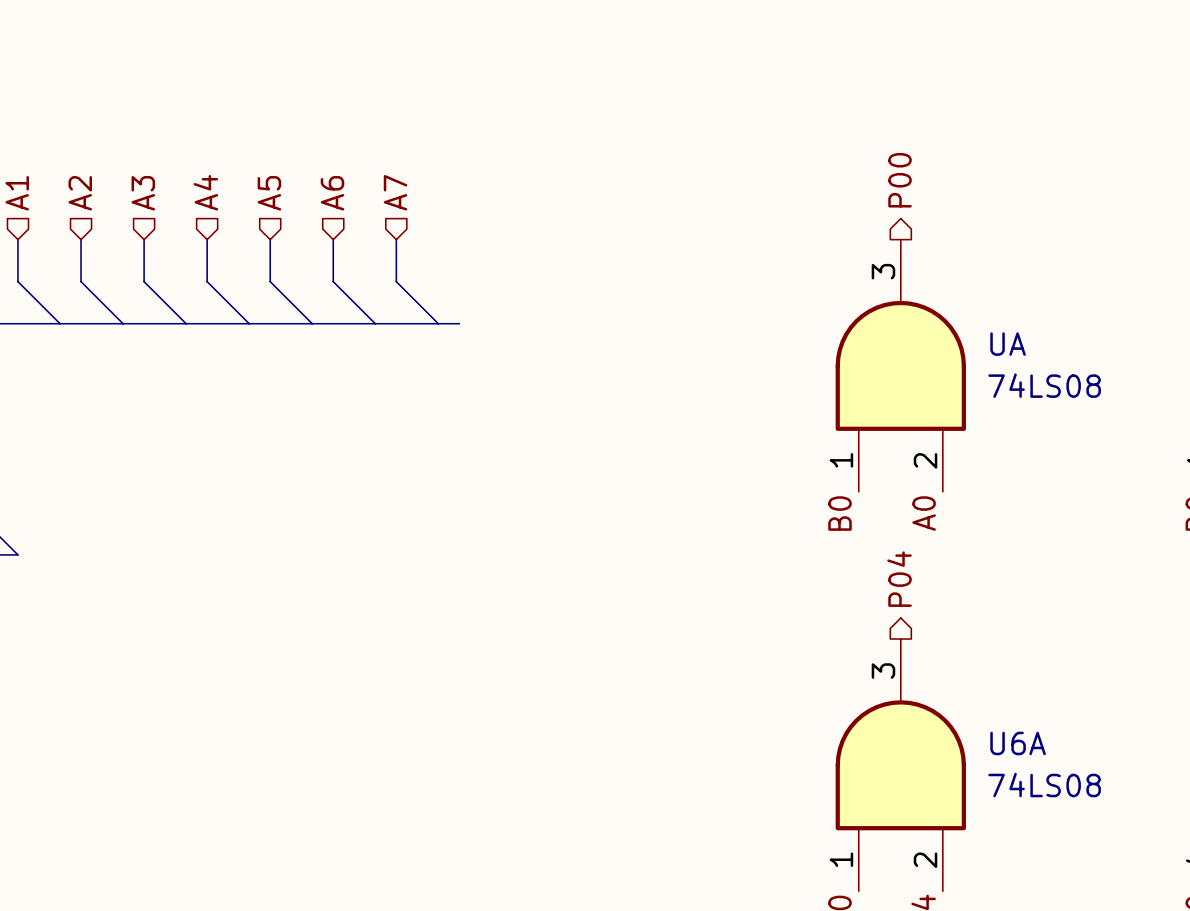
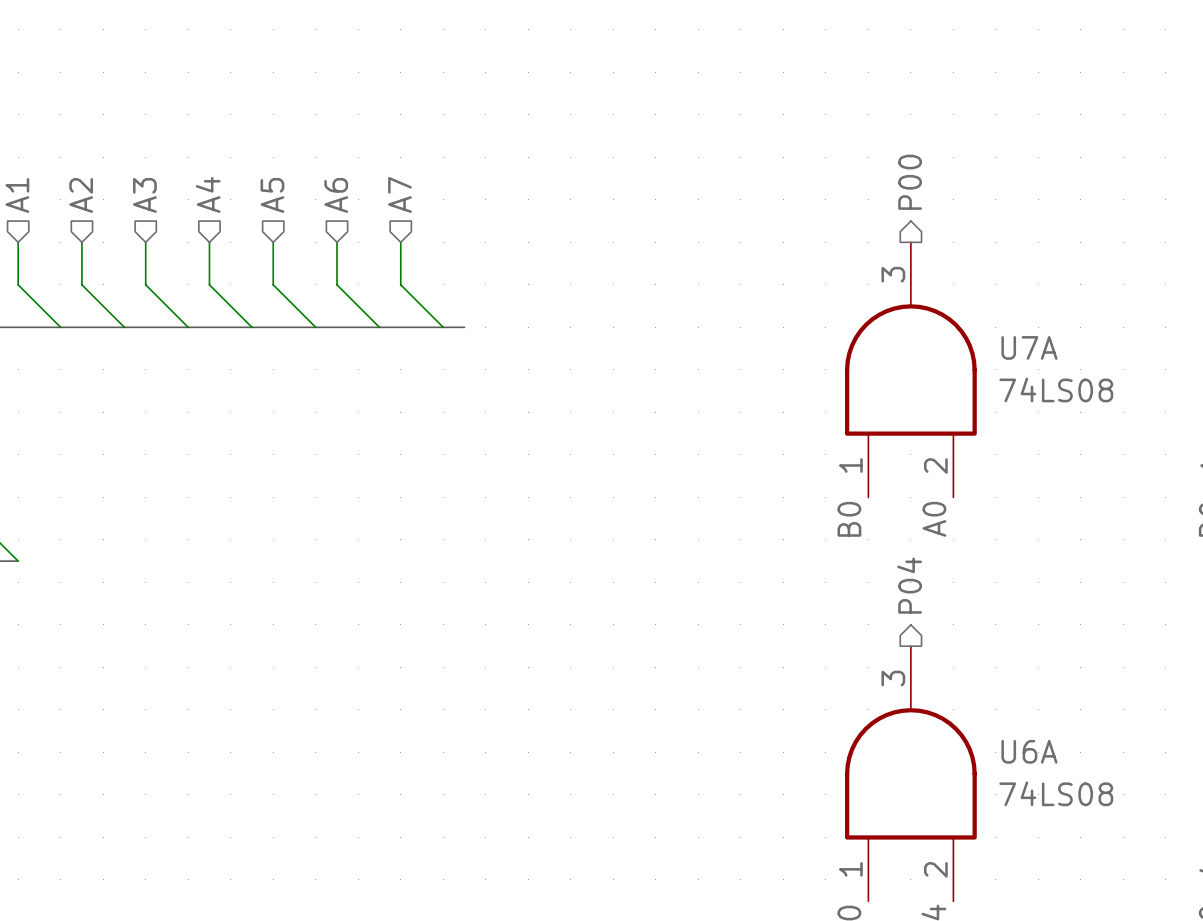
UA name: UA (1008, 344) -> U7A (1029, 347)

